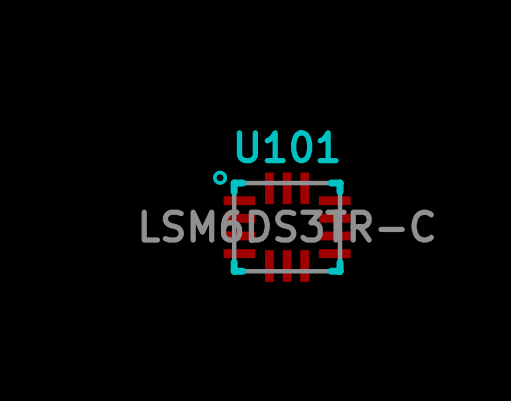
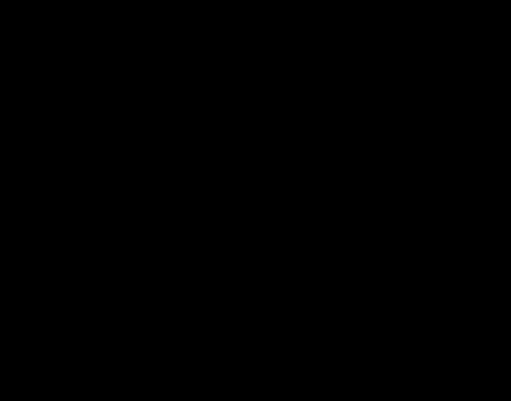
U101: LSM6DS3TR-C (281, 226) -> none

